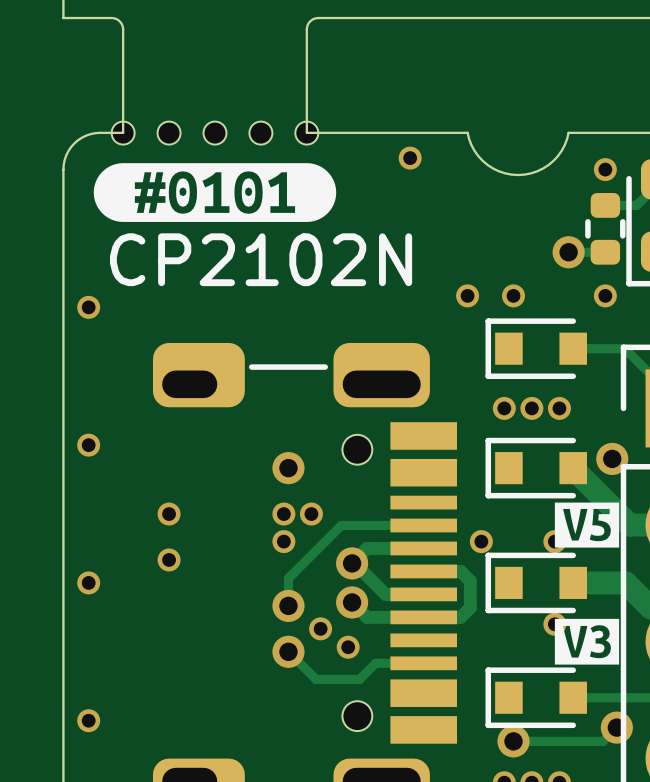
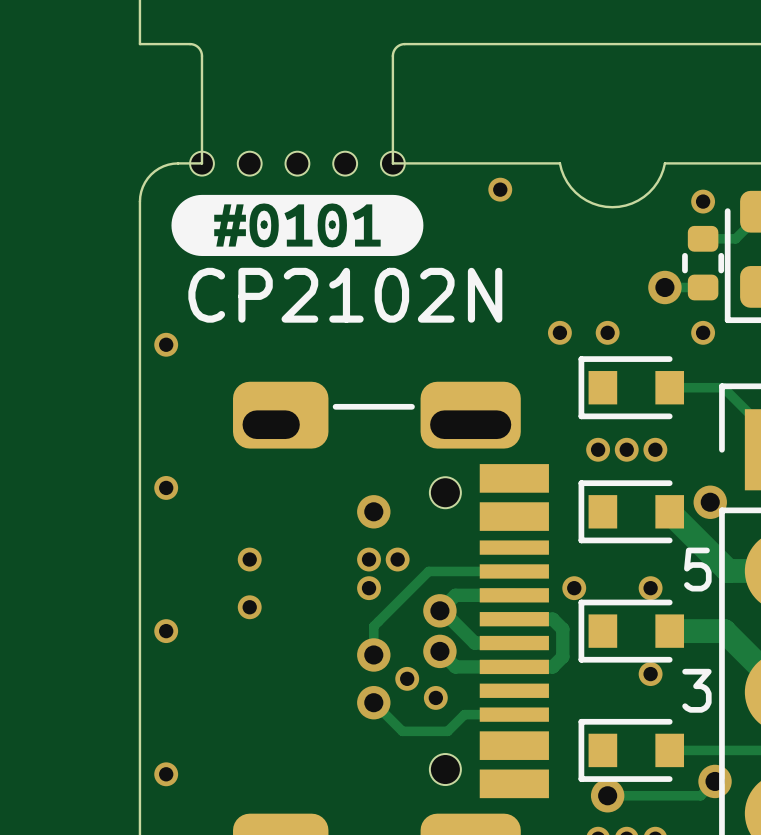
drawing: [554, 502, 620, 548] -> none
text: none -> 5 (697, 569)
drawing: [554, 618, 620, 665] -> none
text: none -> 3 (696, 690)

